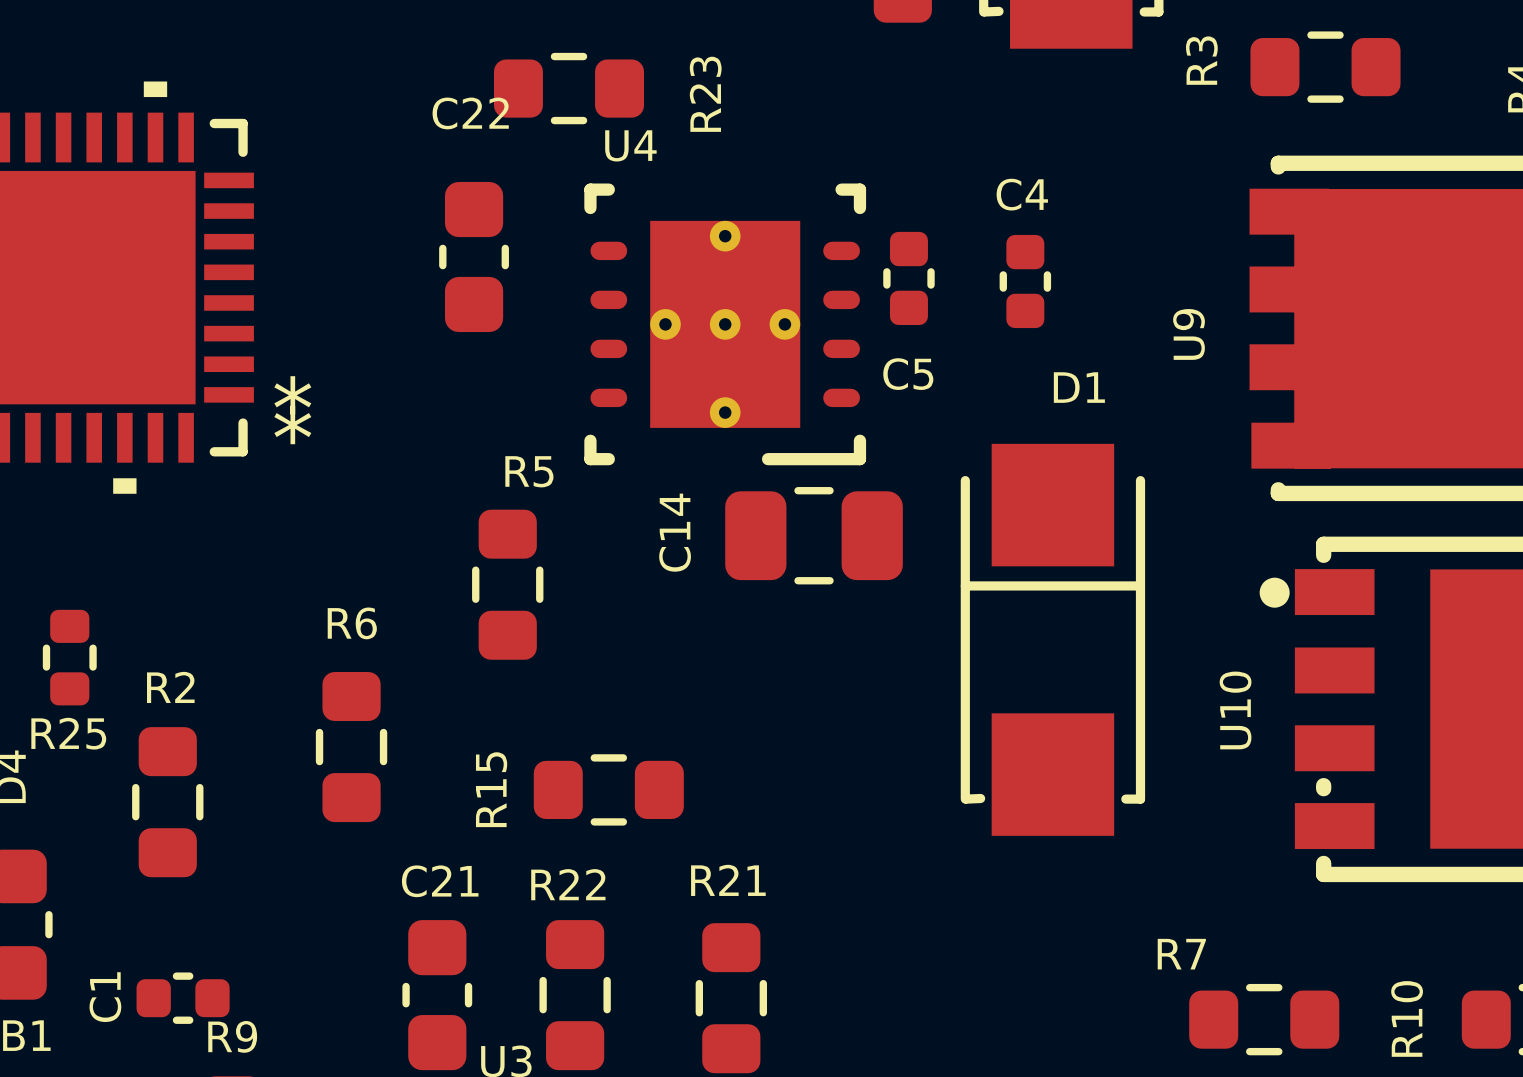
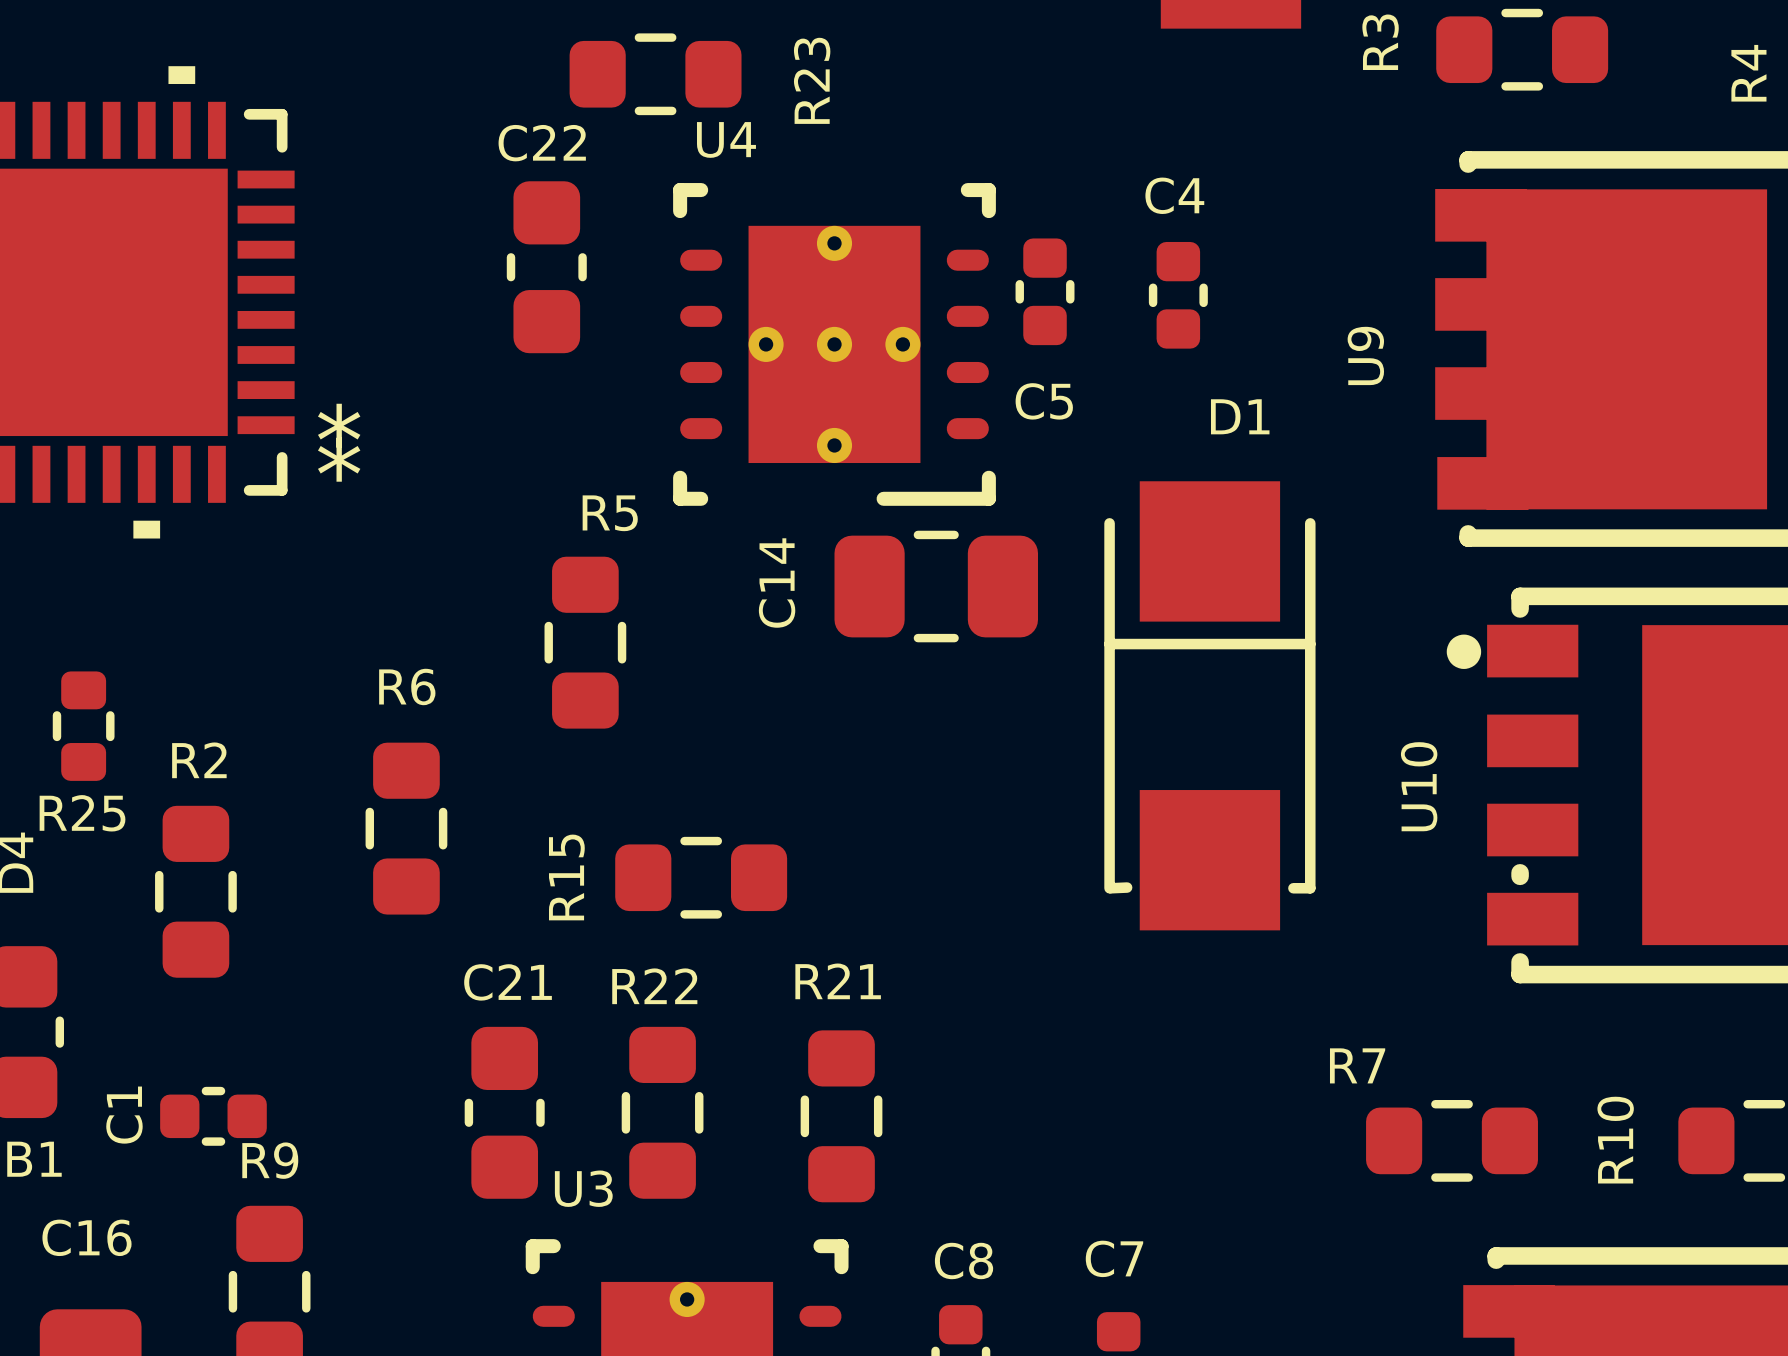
C22 name position: C22 (470, 113) -> C22 (542, 143)

